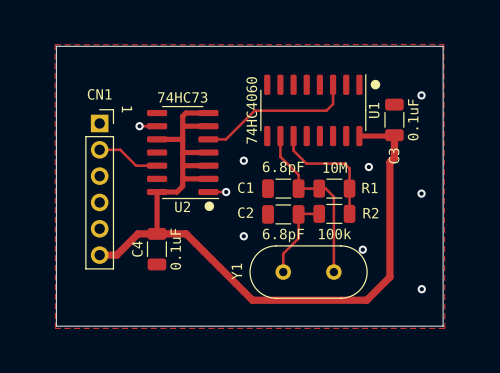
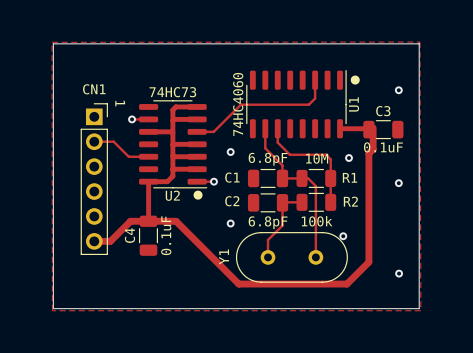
C3 rotation: 0° (394, 119) -> 90° clockwise (383, 129)
C3 name position: C3 (394, 156) -> C3 (383, 111)

